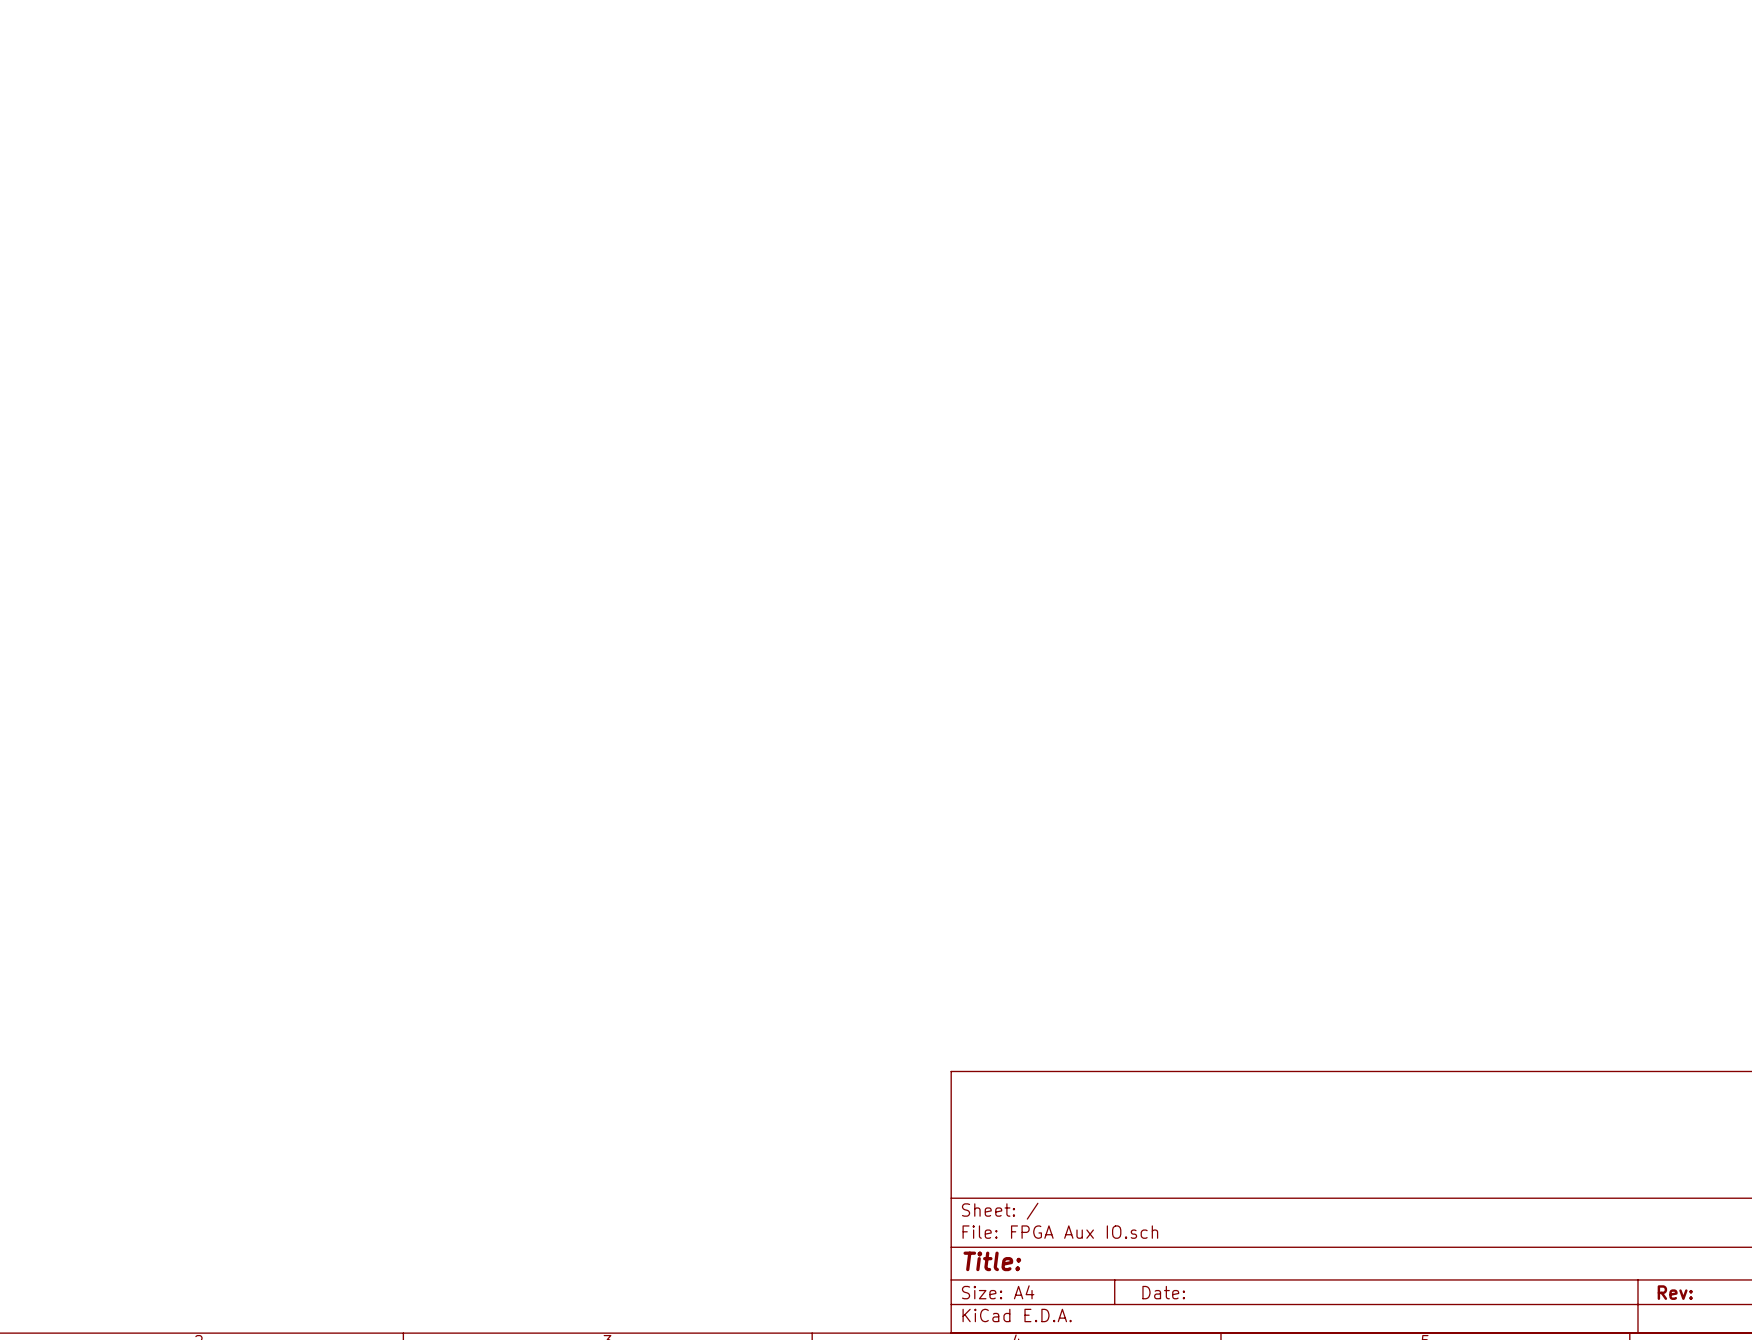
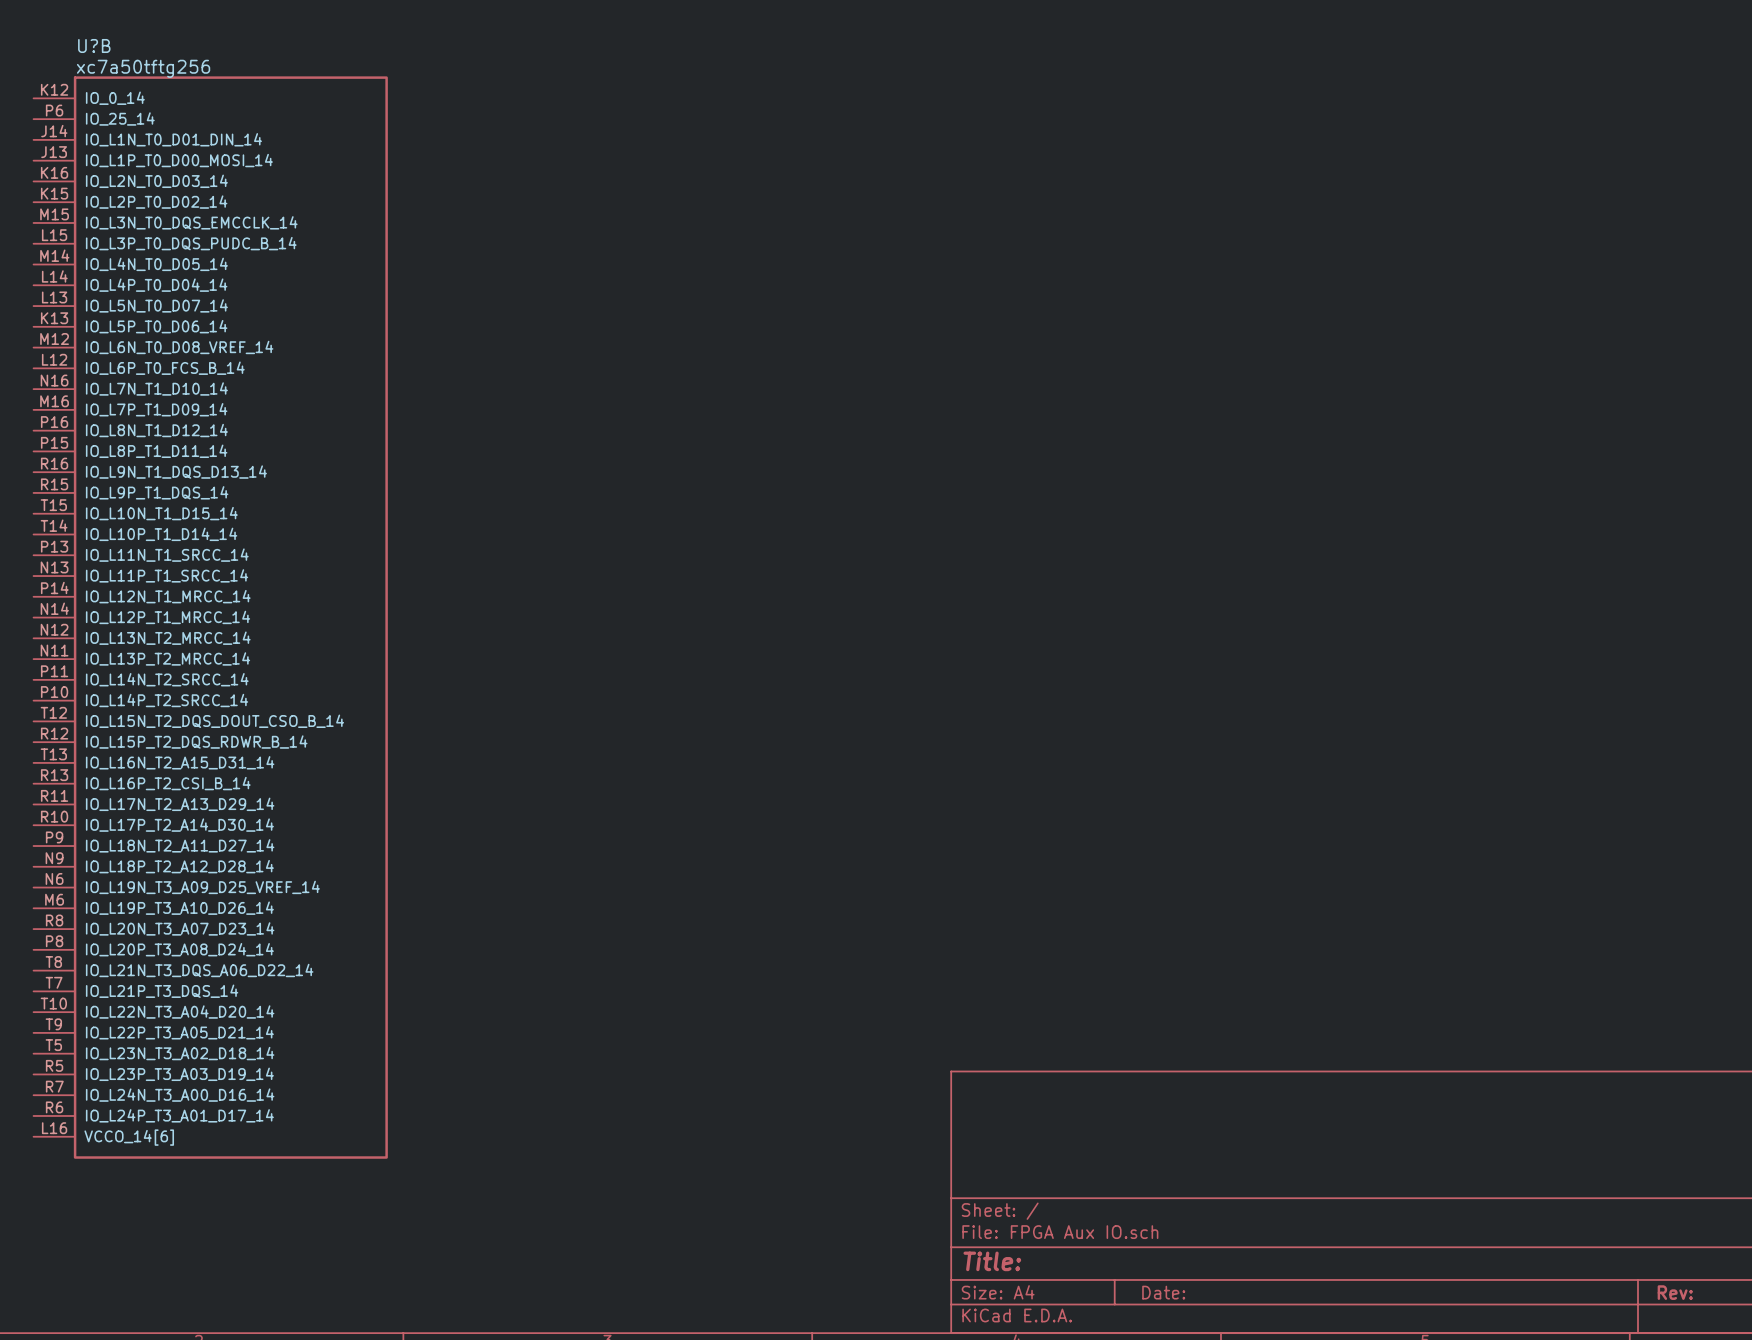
U?B: none -> xc7a50tftg256 (210, 617)

